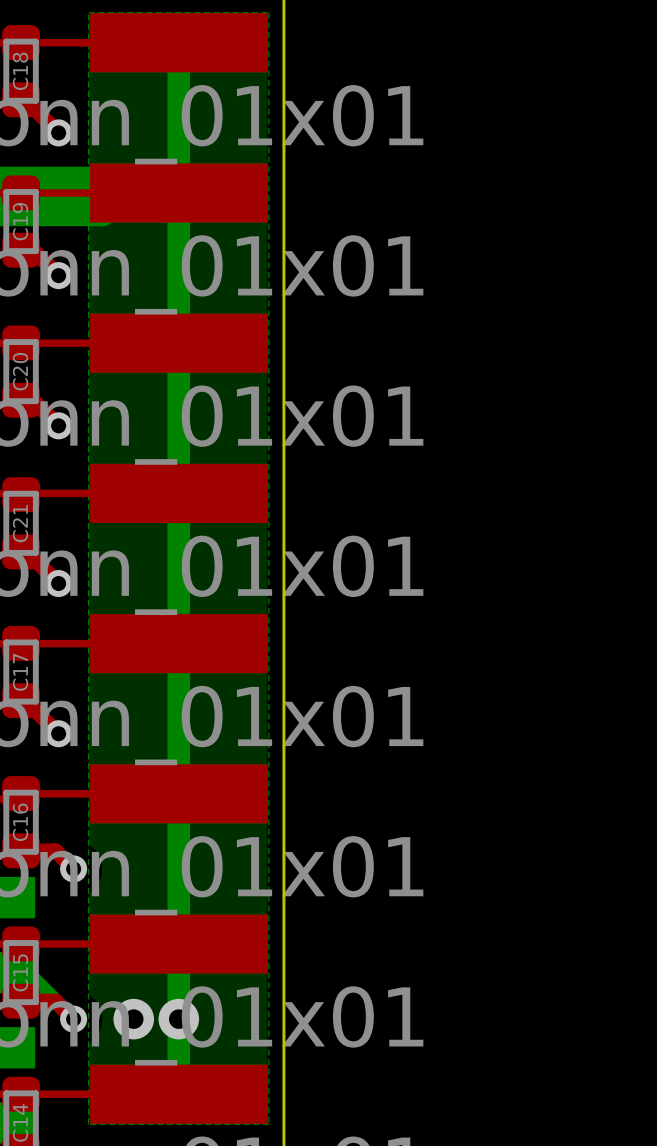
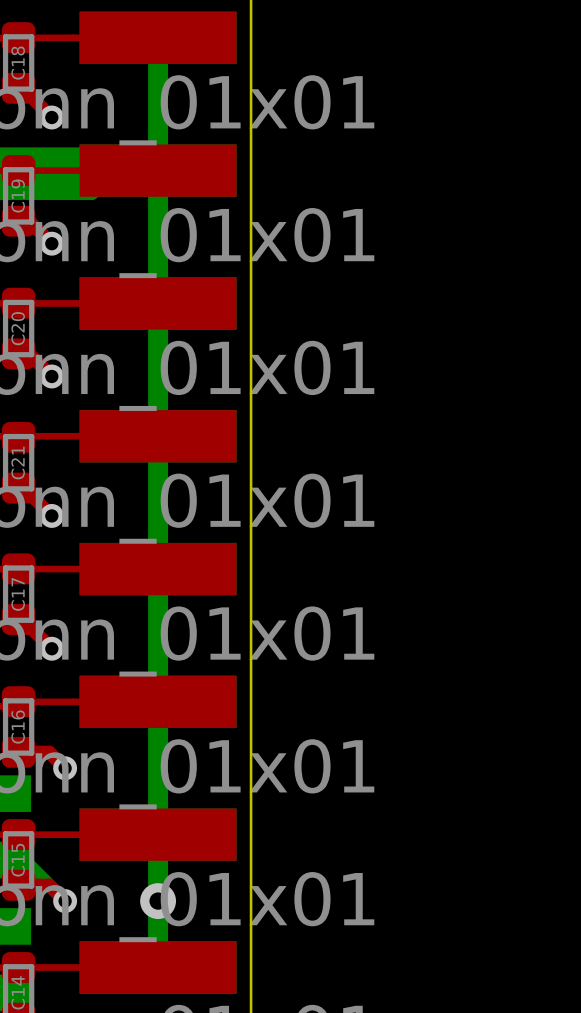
bottom zone outline: (88, 12) (268, 12) (268, 1124) (88, 1124) (88, 12) -> none
via: (133, 1019) -> none

